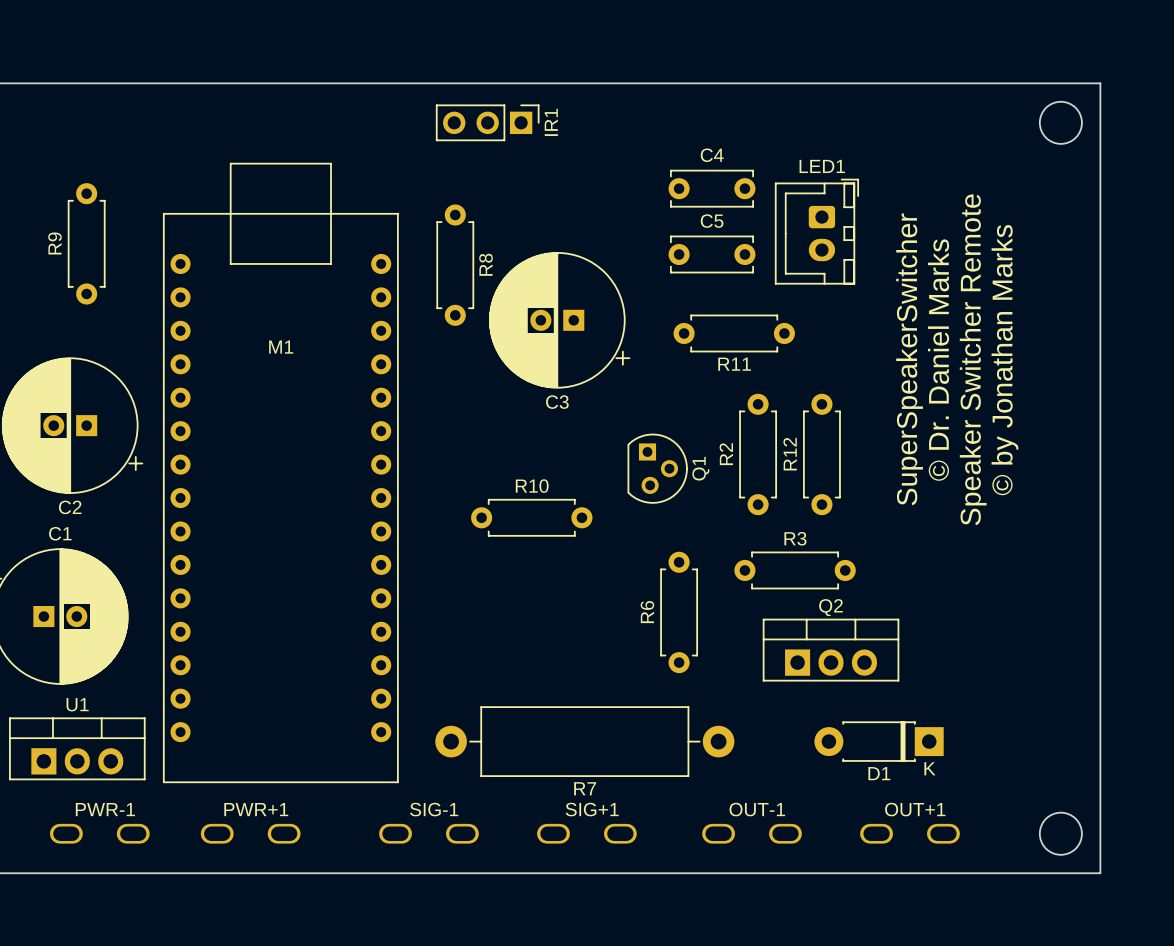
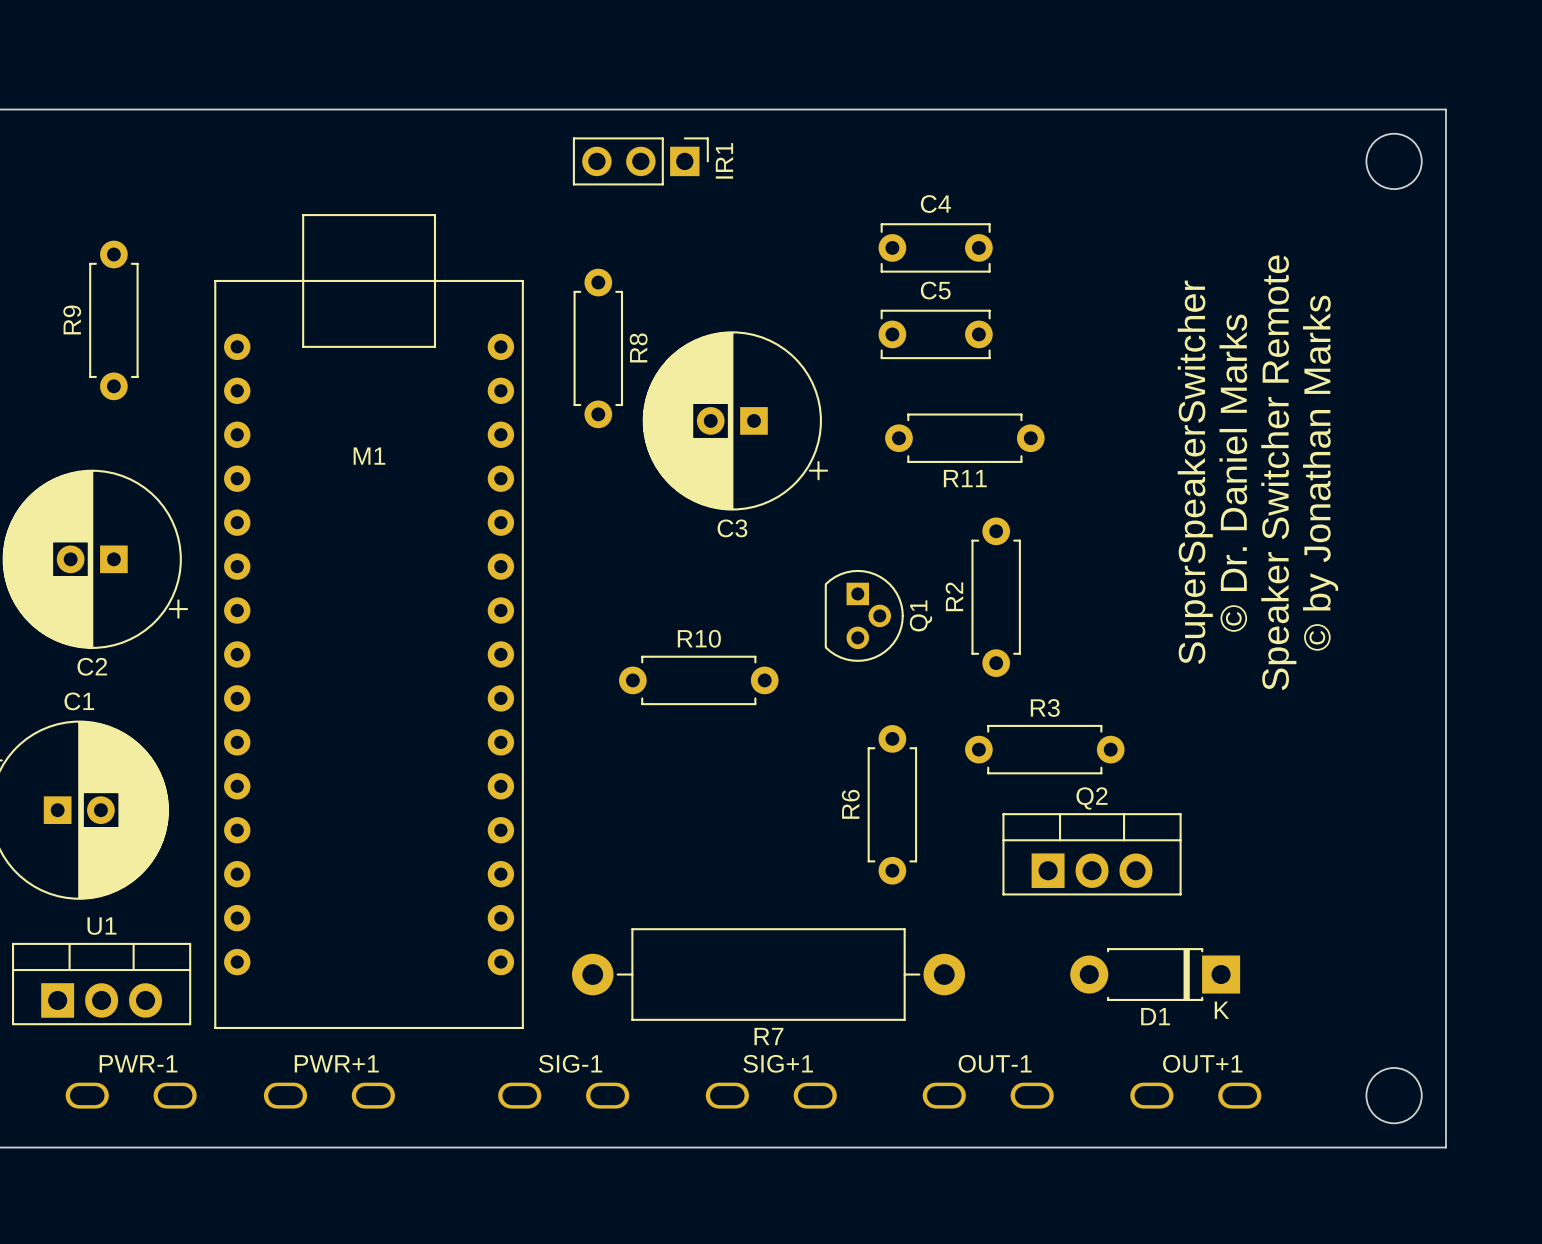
LED1: (816, 231) -> none
Q1 footprint: [627, 433, 688, 504] -> [824, 569, 904, 662]
R12: (821, 454) -> none

